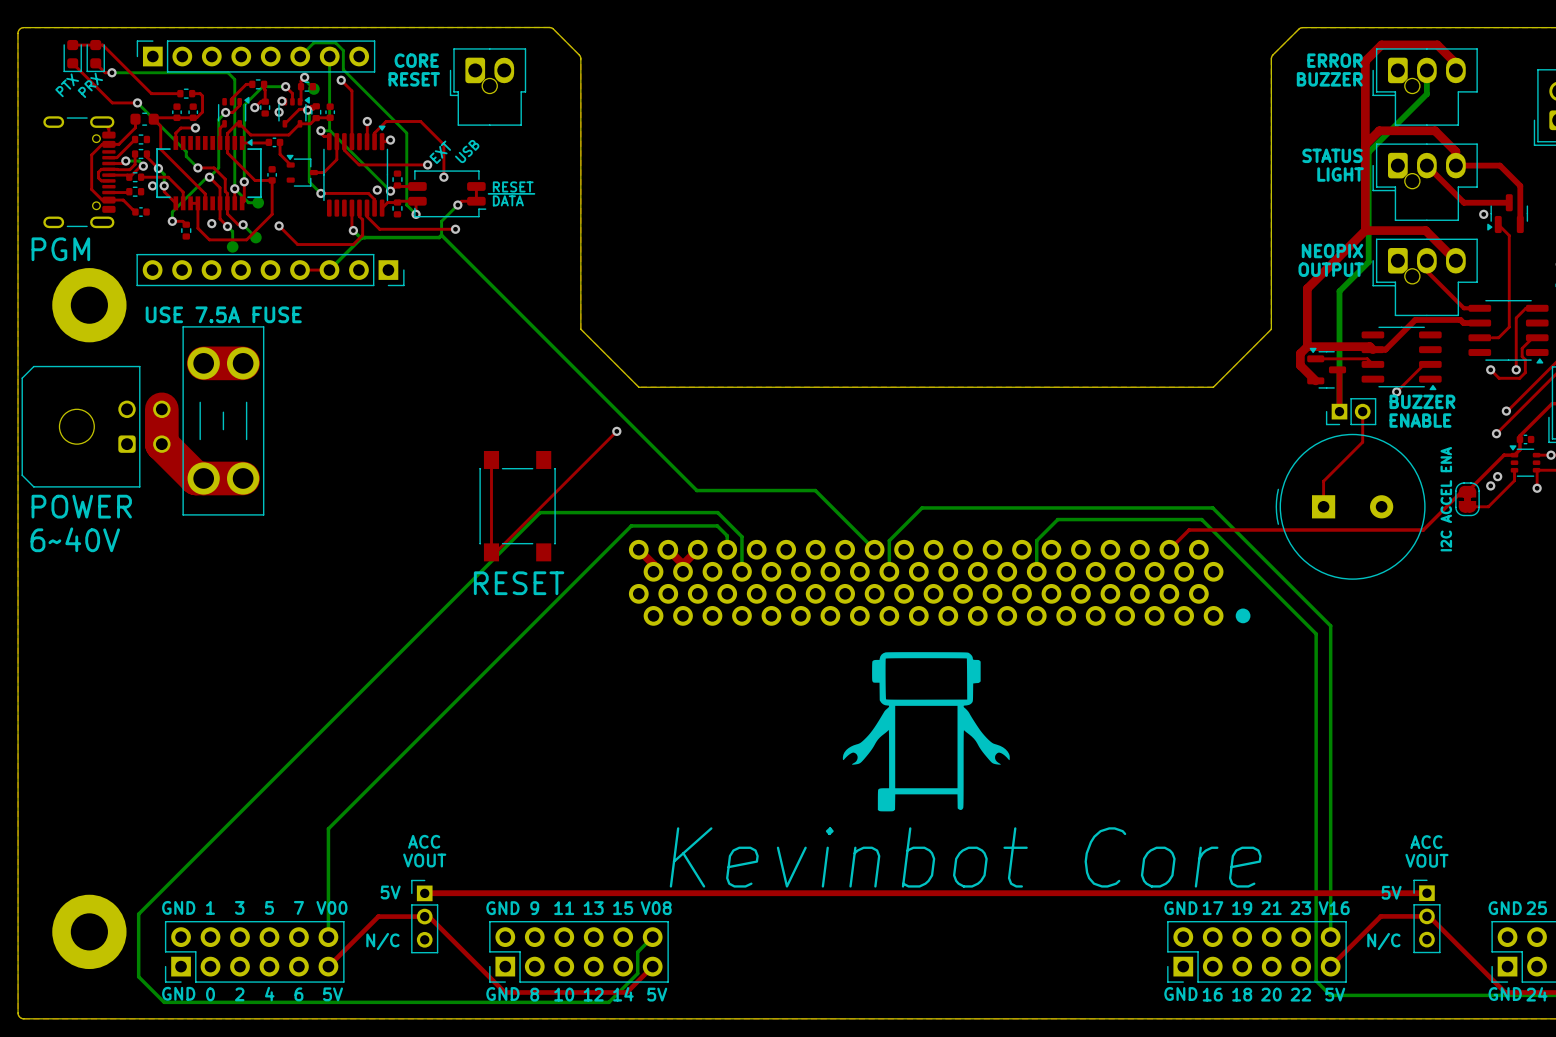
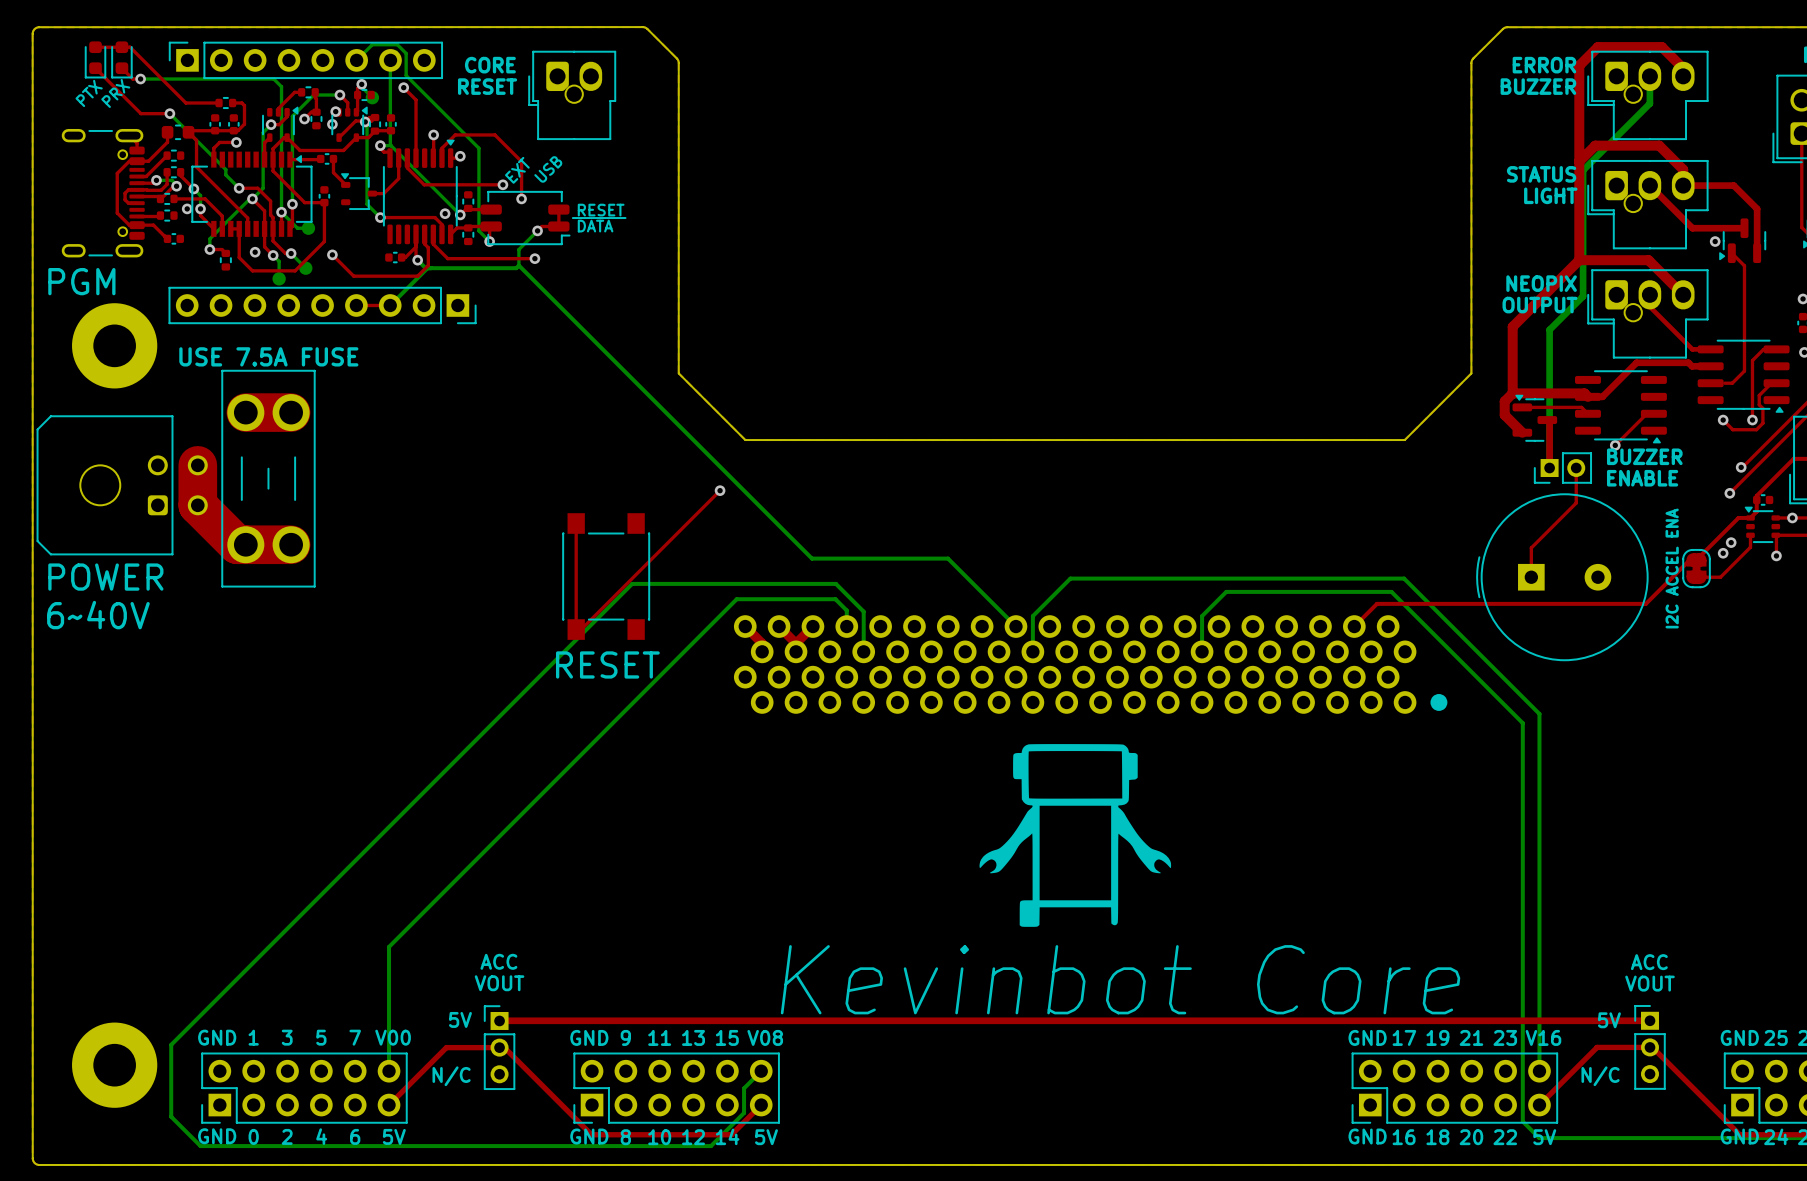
top track: none -> (416, 246) (405, 257) (401, 257)
part: none -> (395, 257)

